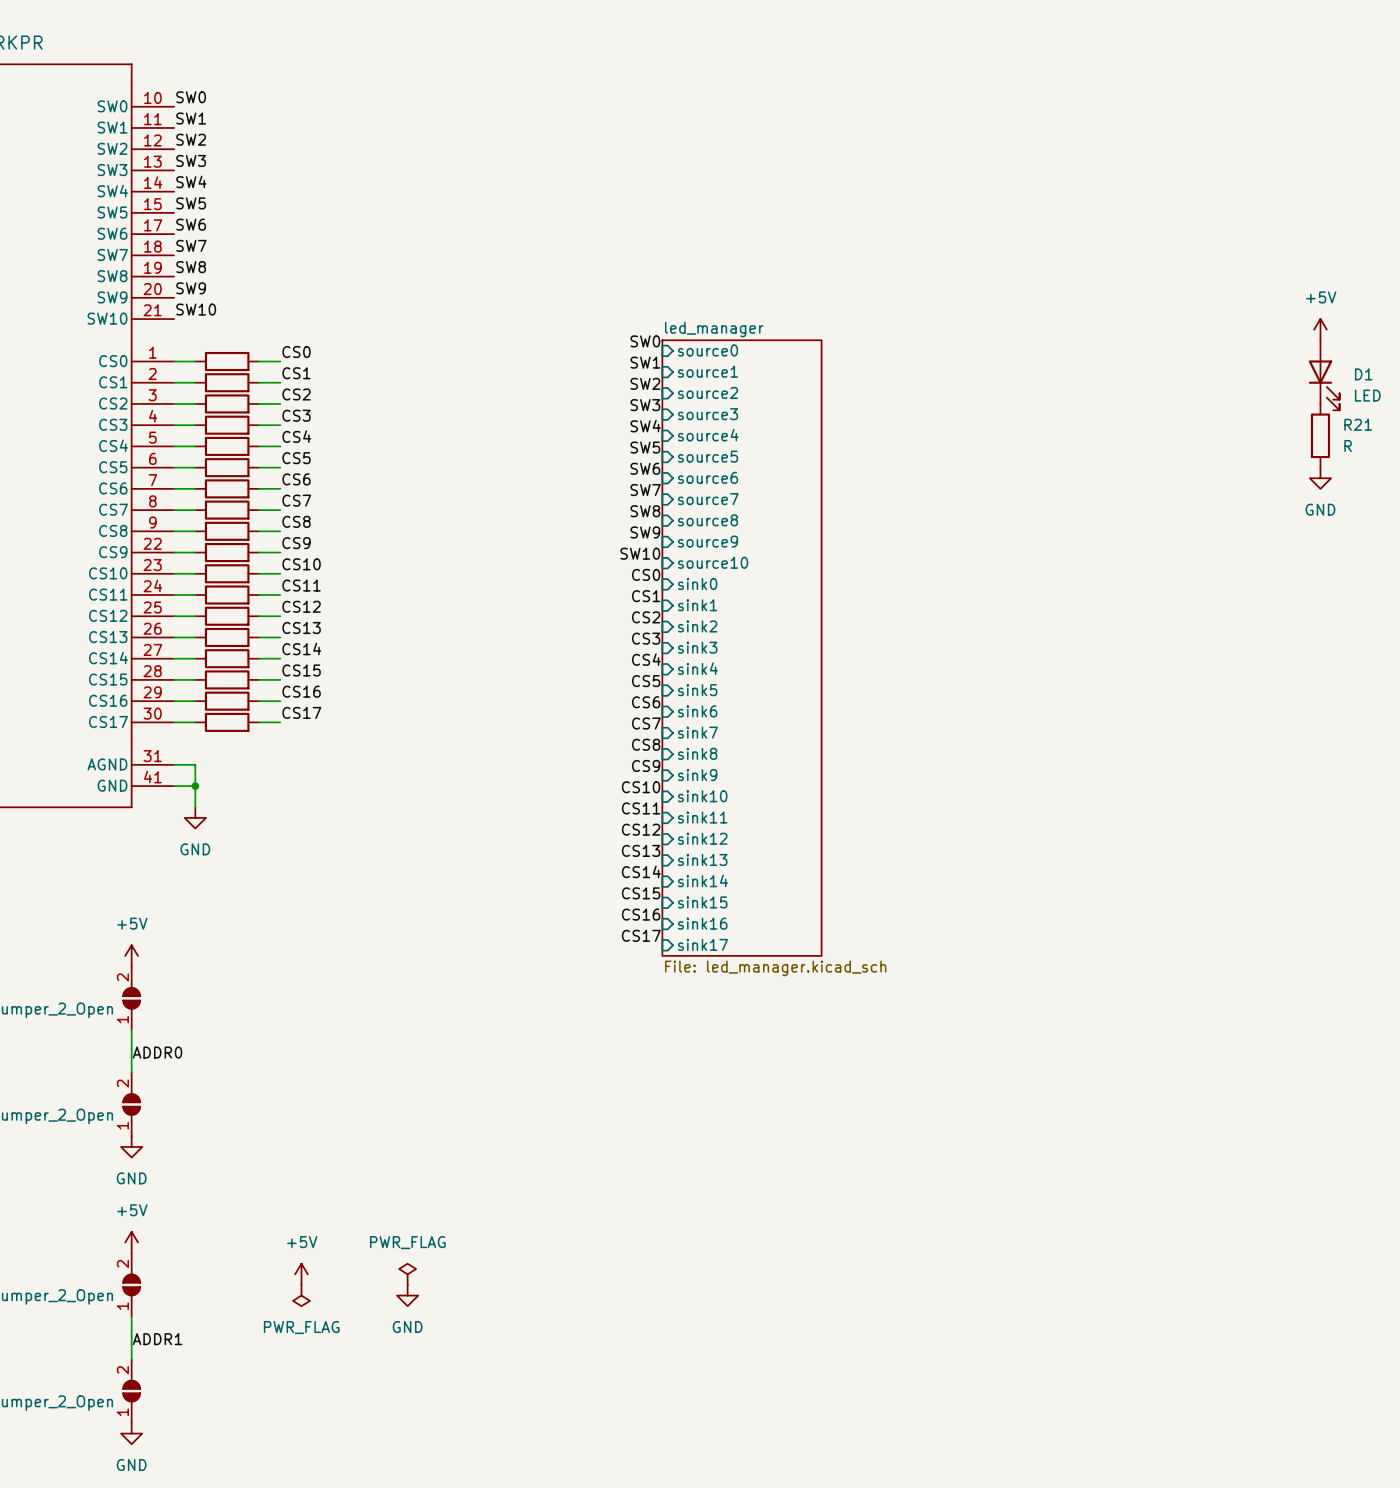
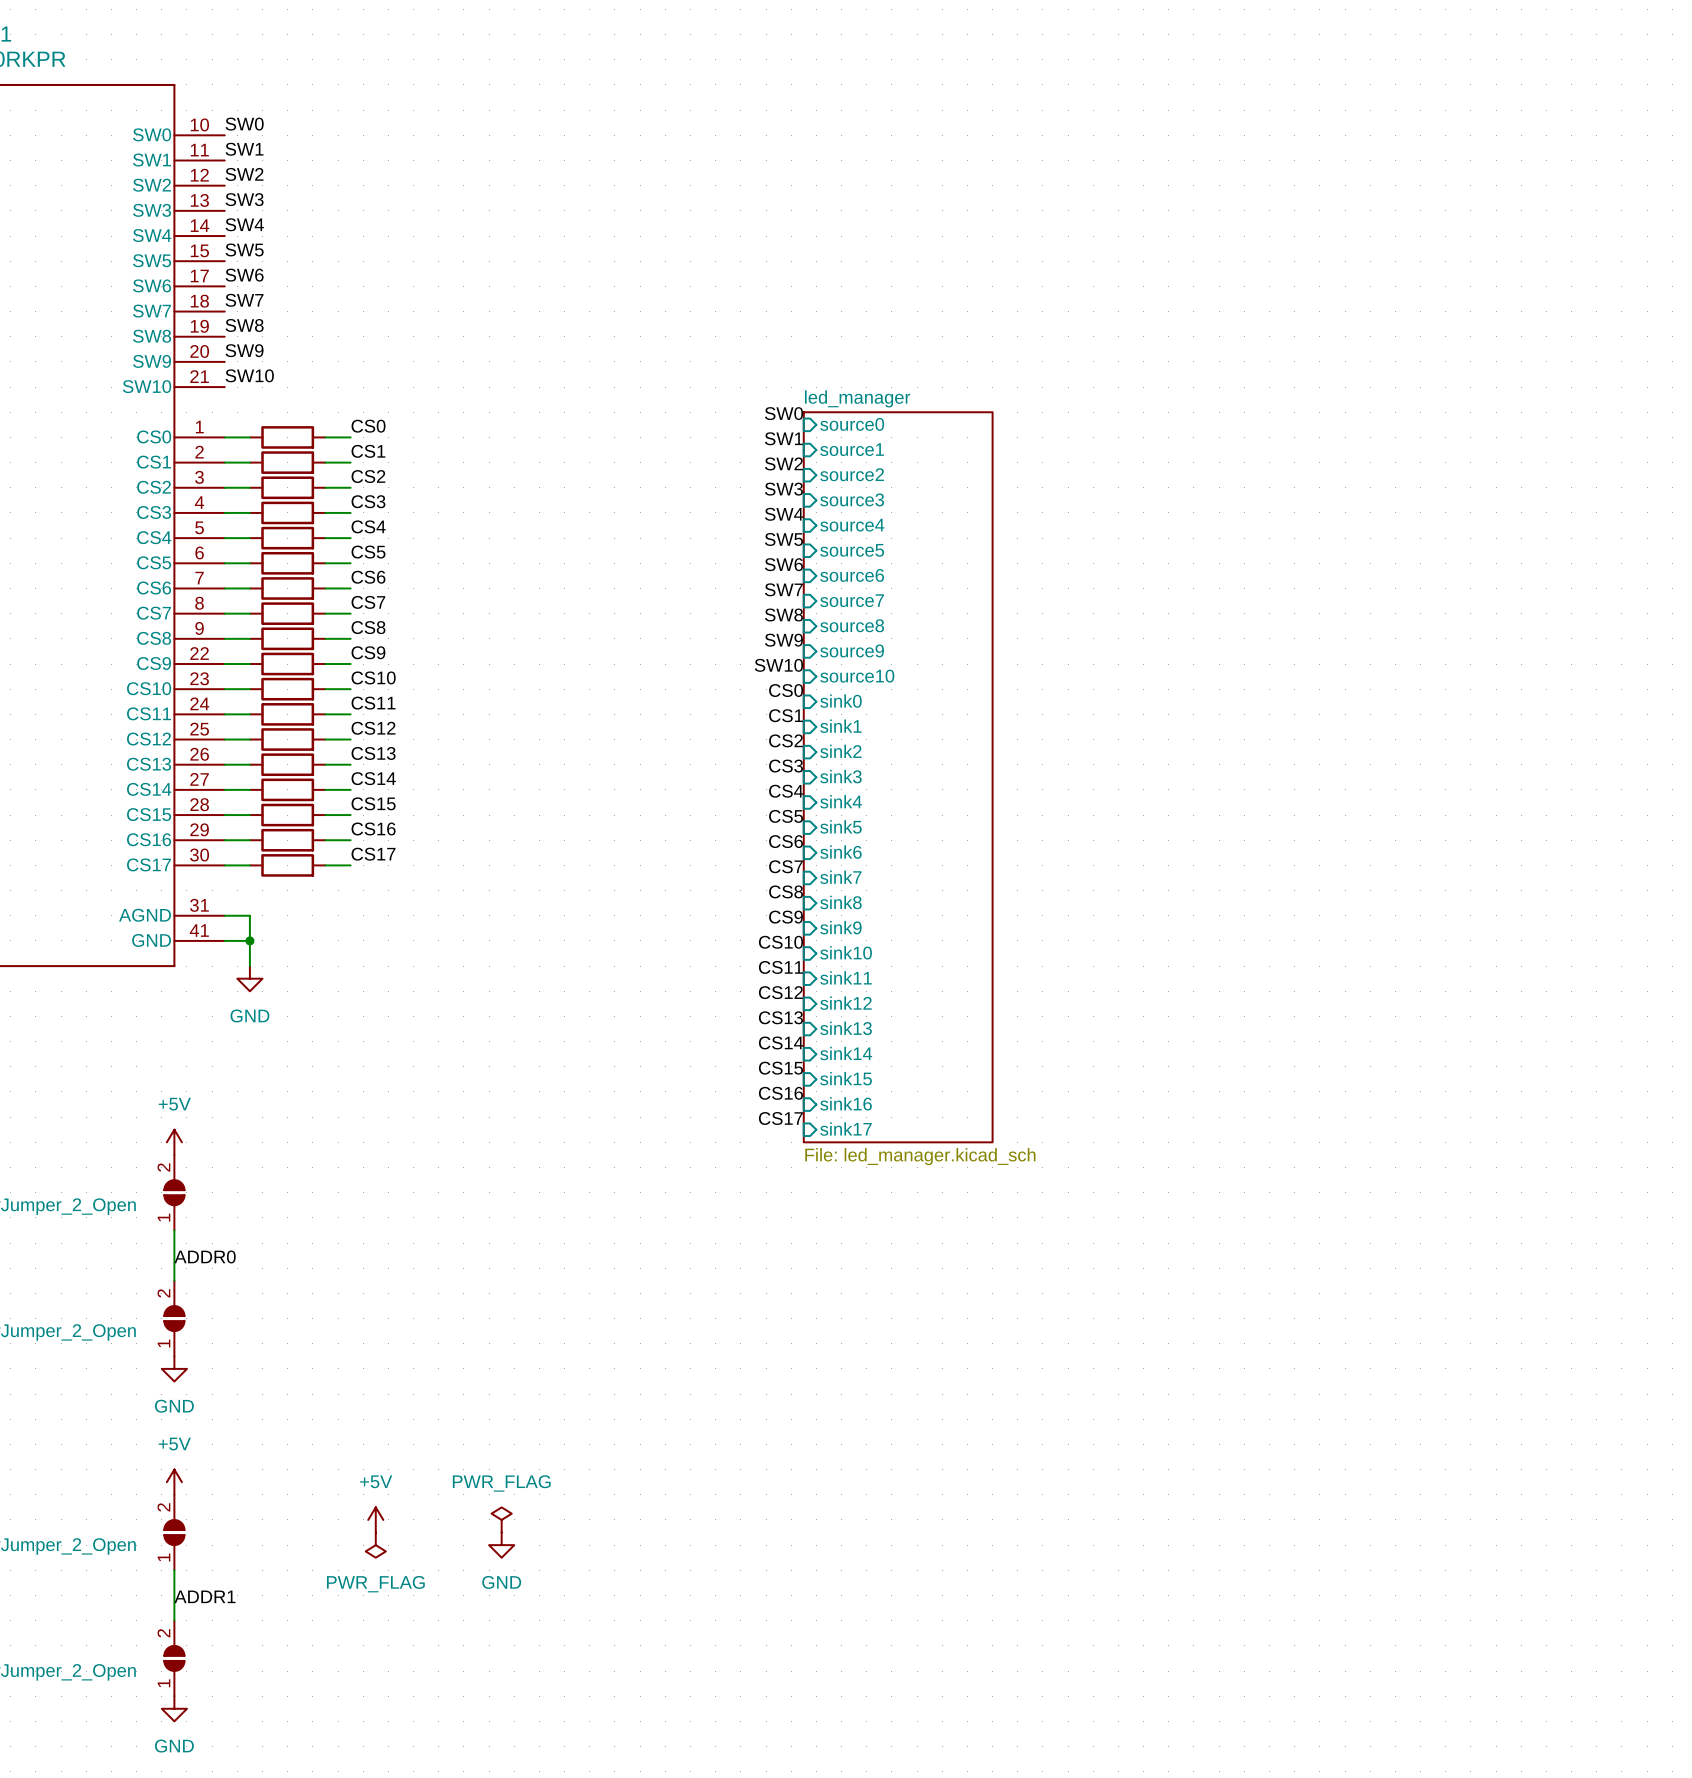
power symbol: +5V (1320, 329) -> none
D1: LED (1324, 375) -> none
R21: R (1320, 435) -> none
power symbol: GND (1320, 478) -> none

